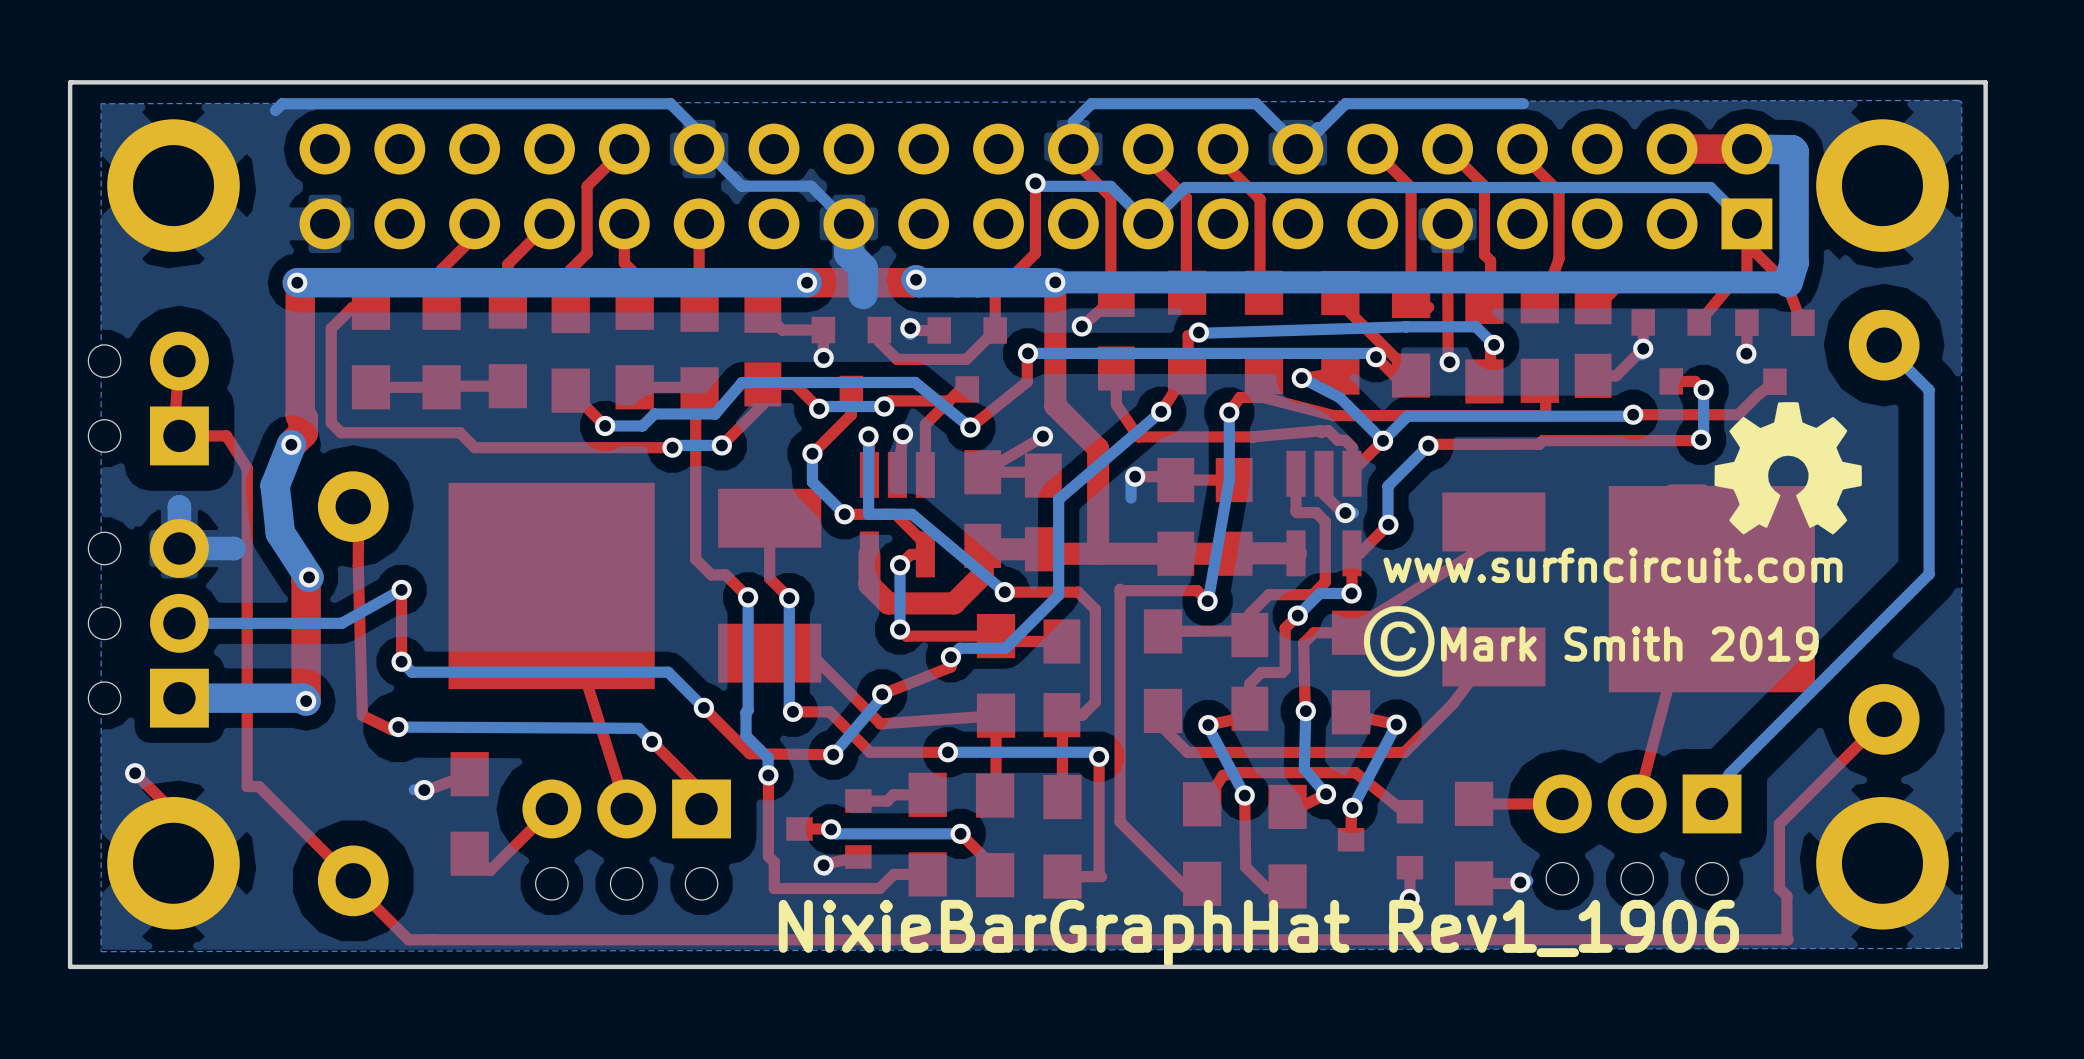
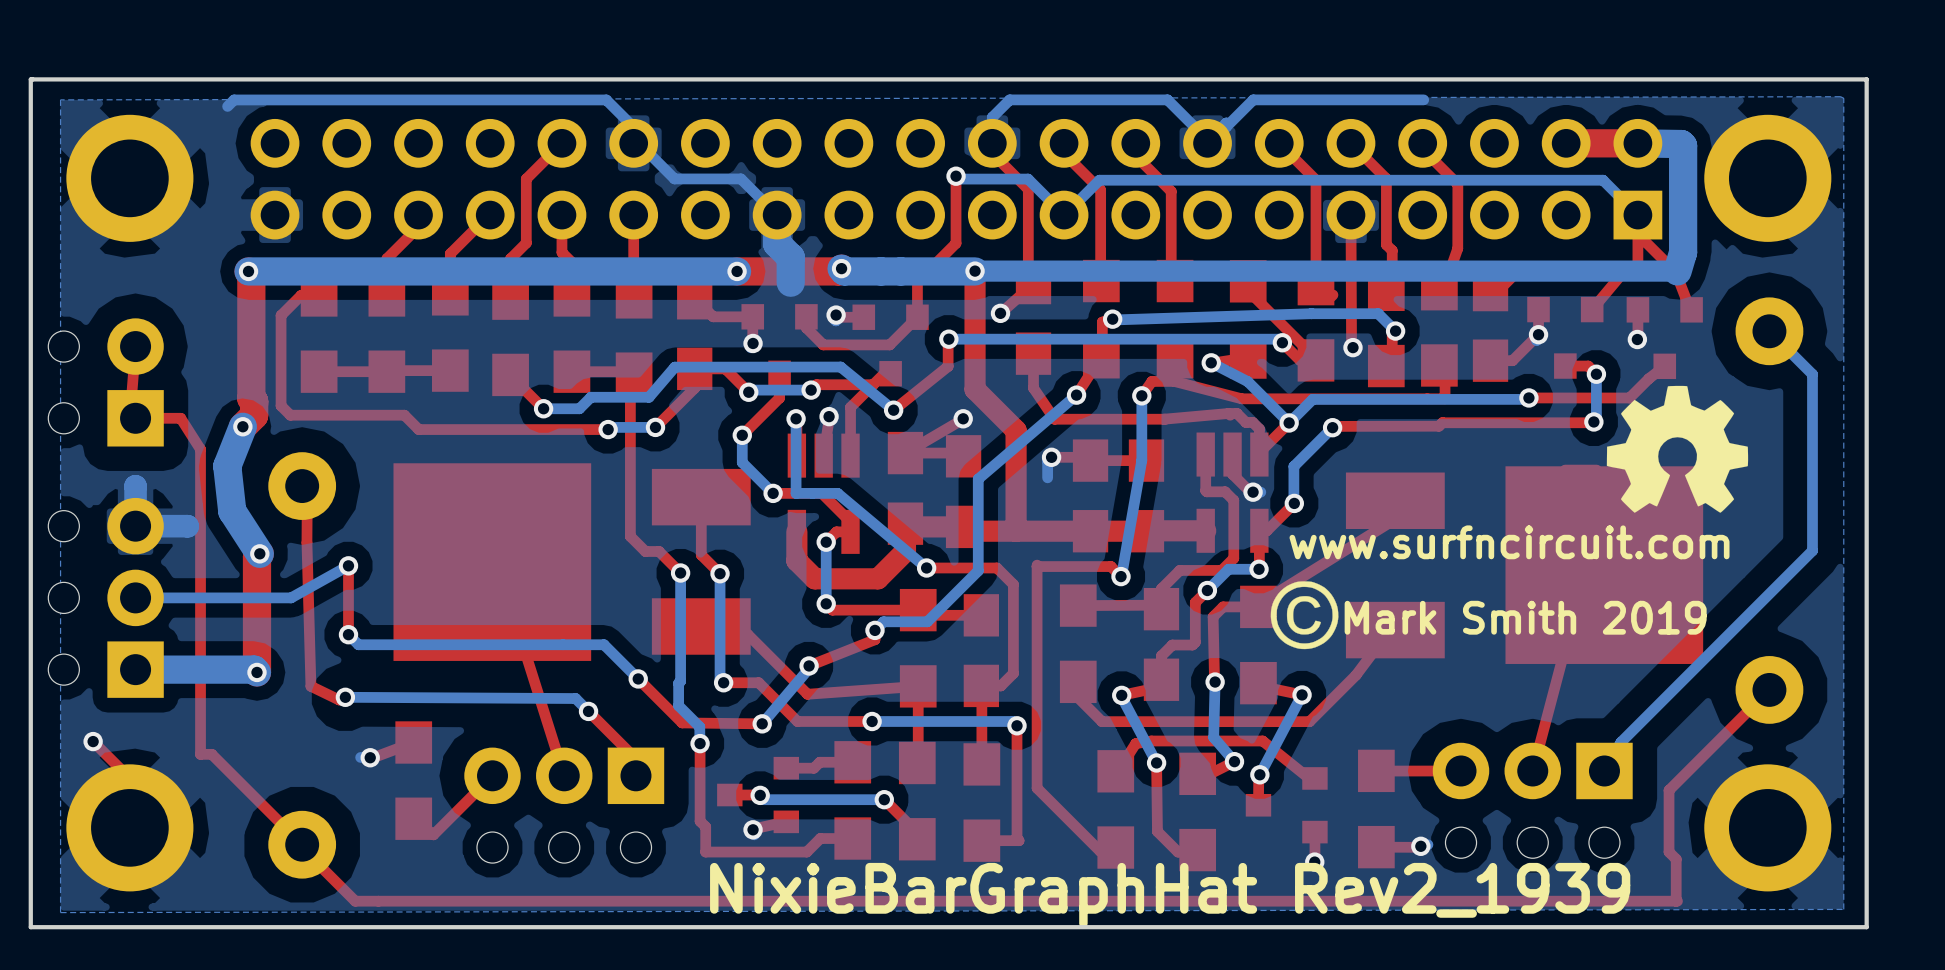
text: NixieBarGraphHat Rev1_1906 (1258, 933) -> NixieBarGraphHat Rev2_1939 (1170, 895)

